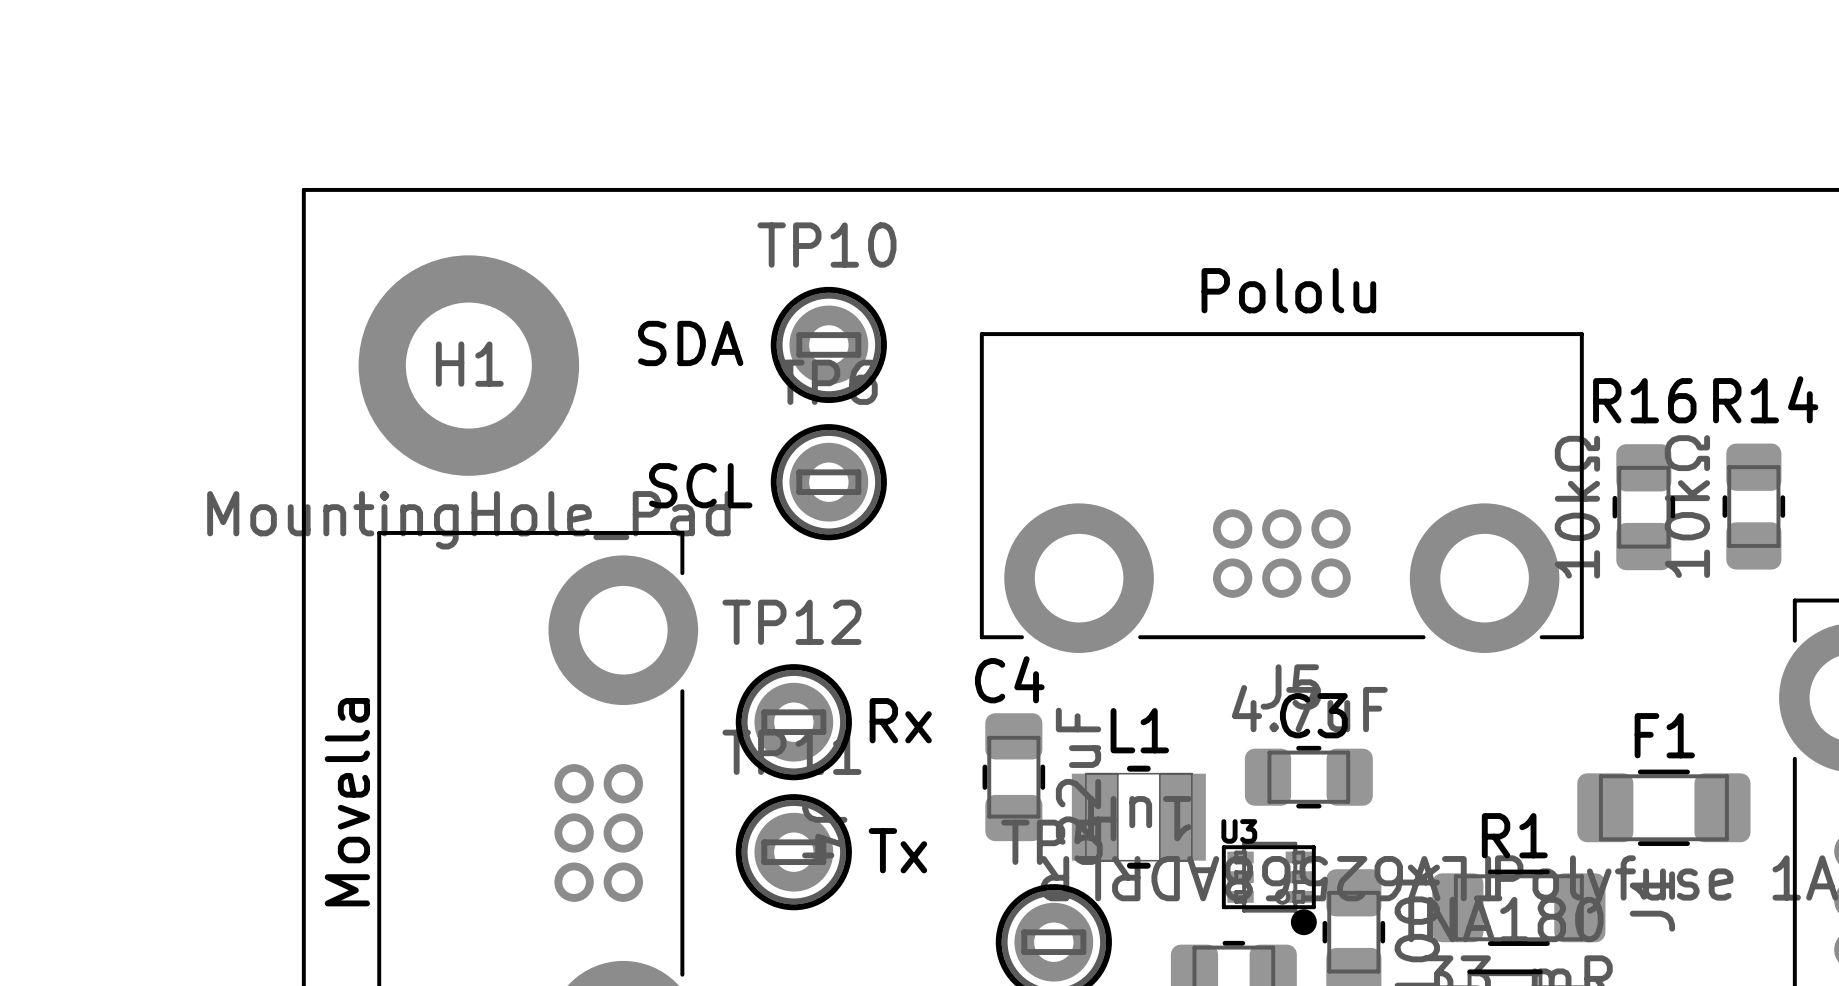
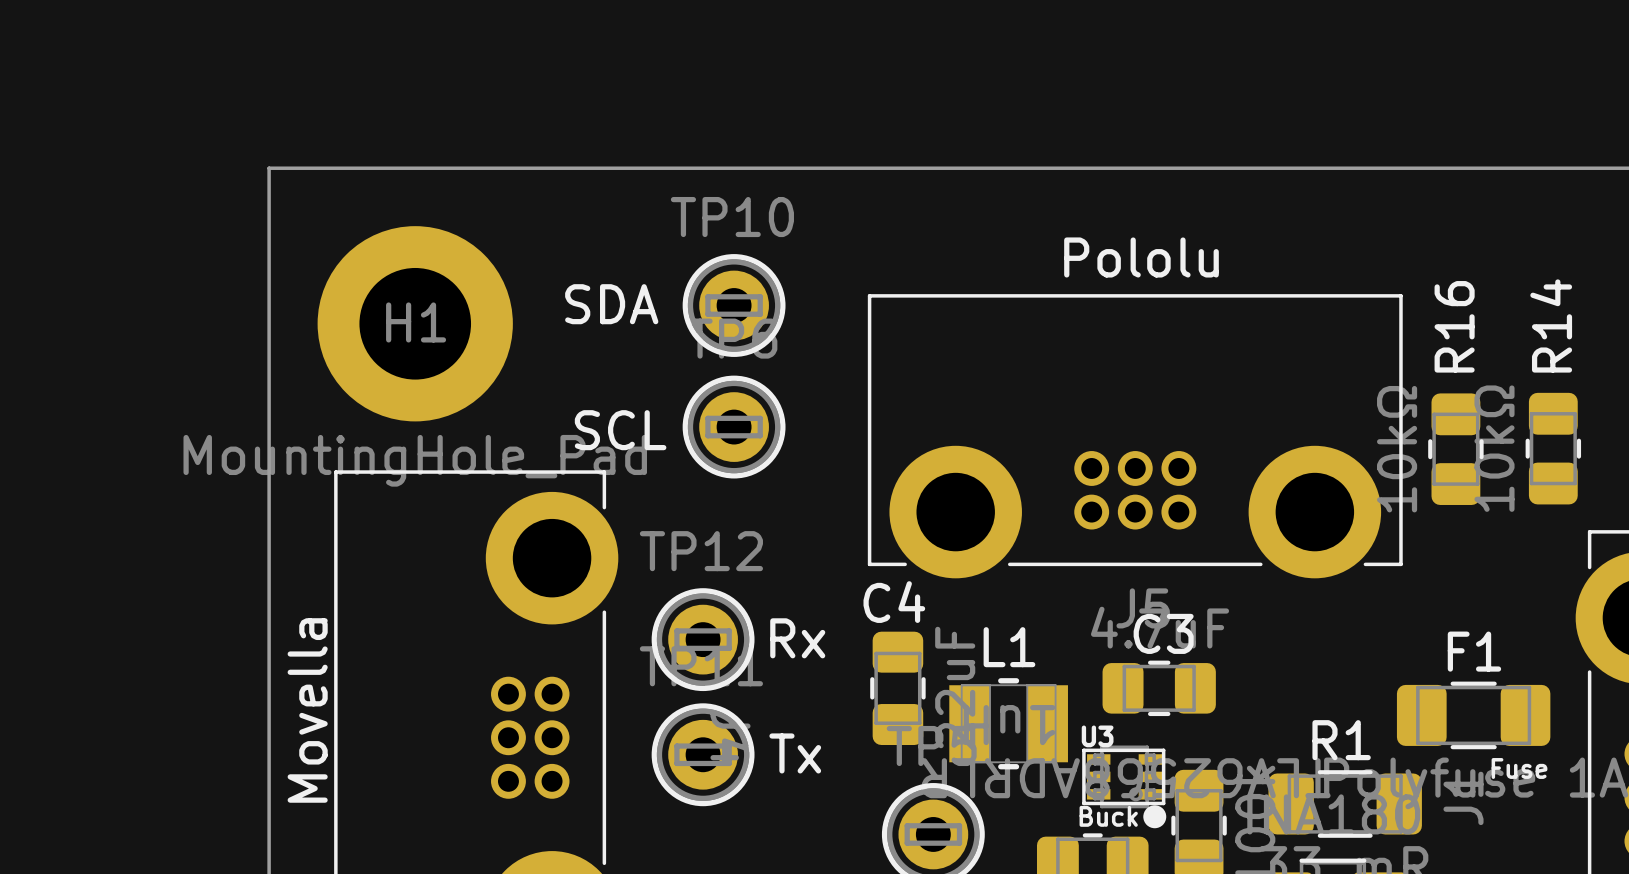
R14 name rotation: 0° (1765, 399) -> 90° counterclockwise (1551, 325)
R16 name rotation: 0° (1644, 400) -> 90° counterclockwise (1454, 326)
text: none -> Fuse (1519, 768)
text: none -> Buck (1108, 816)

